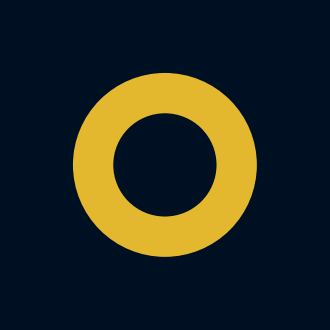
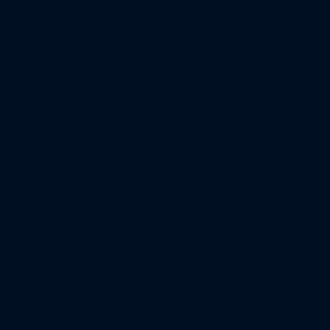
part: (164, 164) -> none

